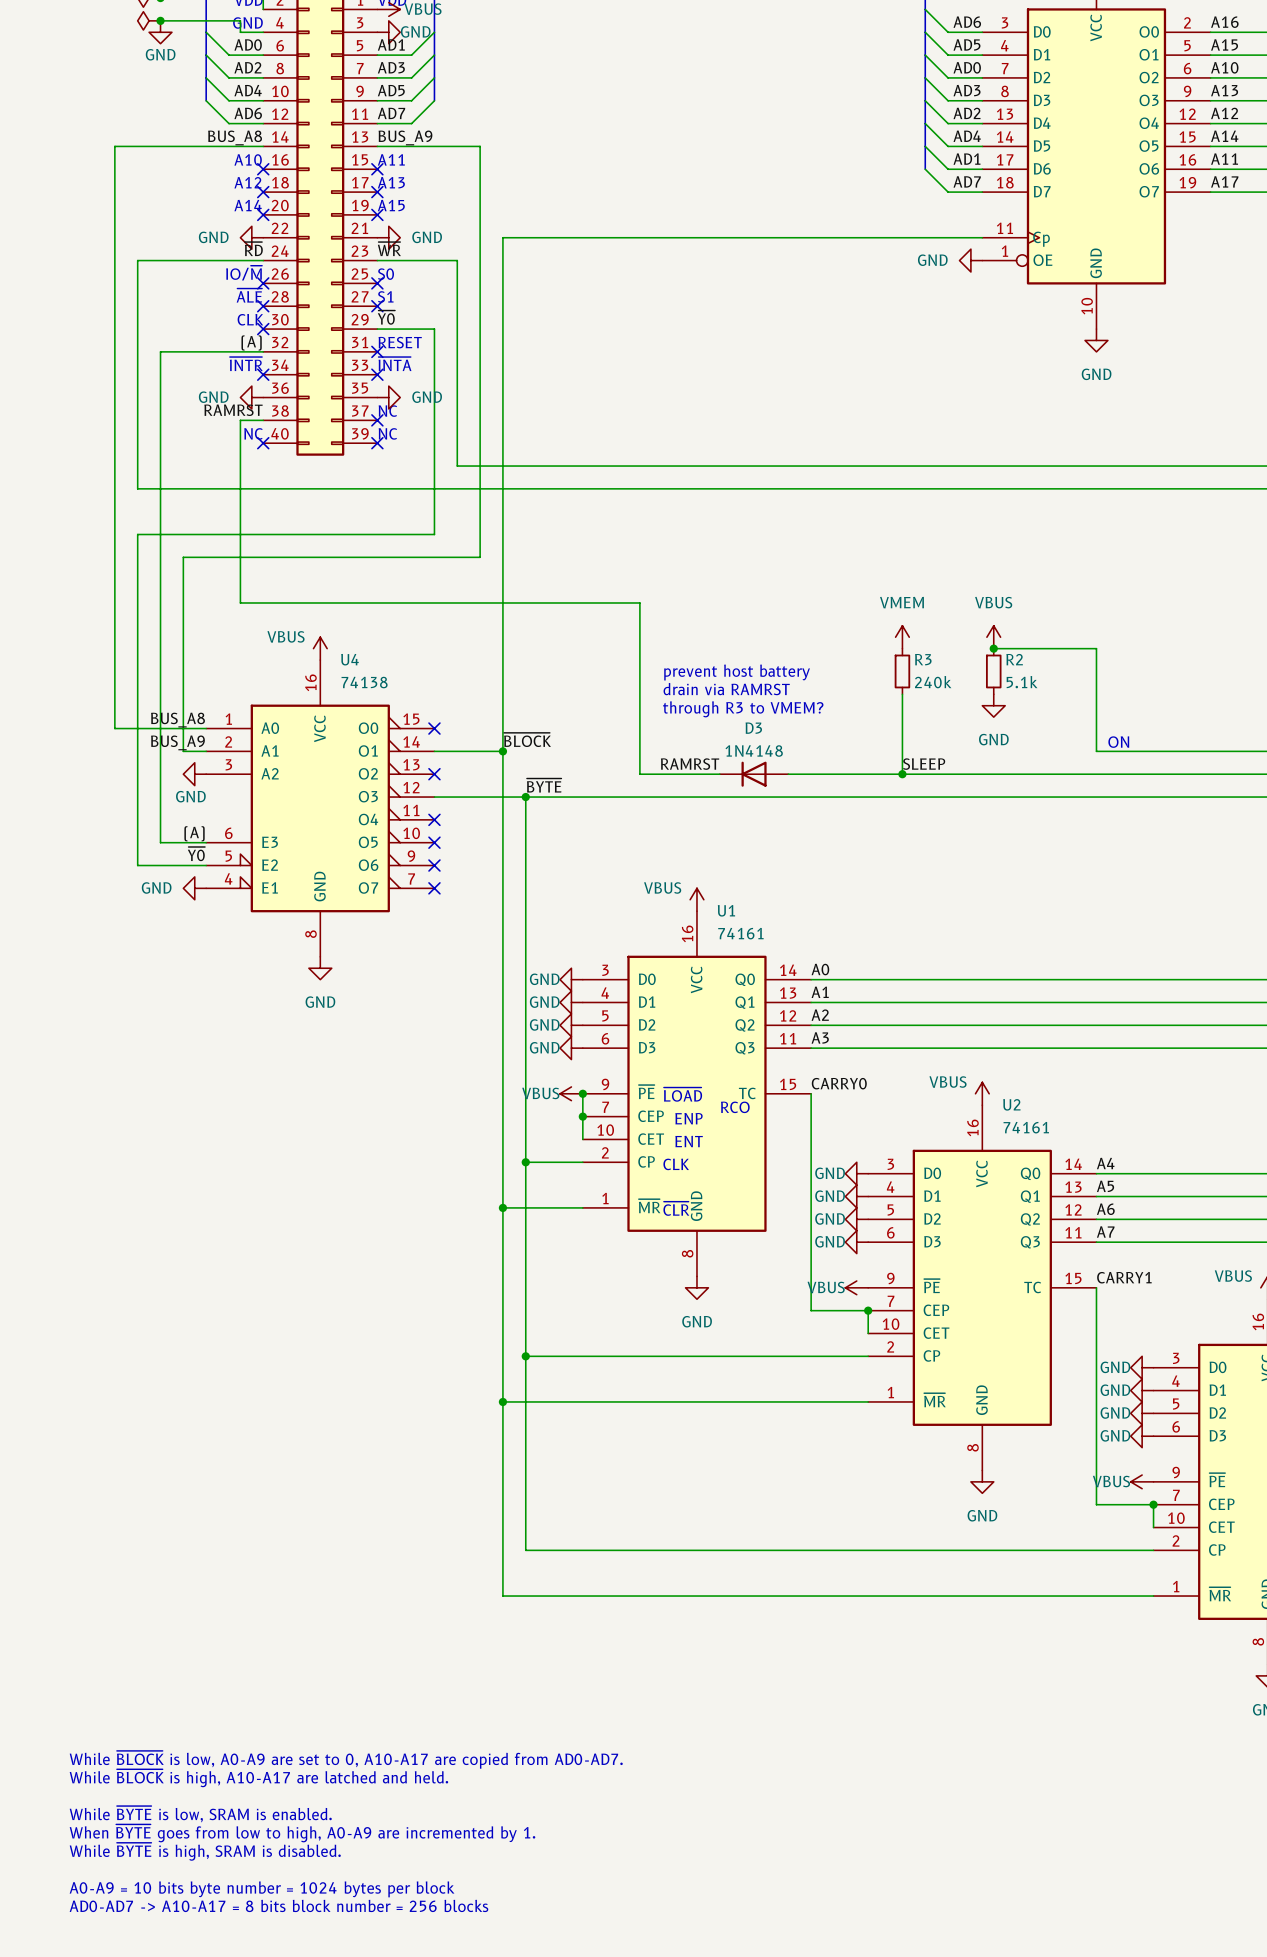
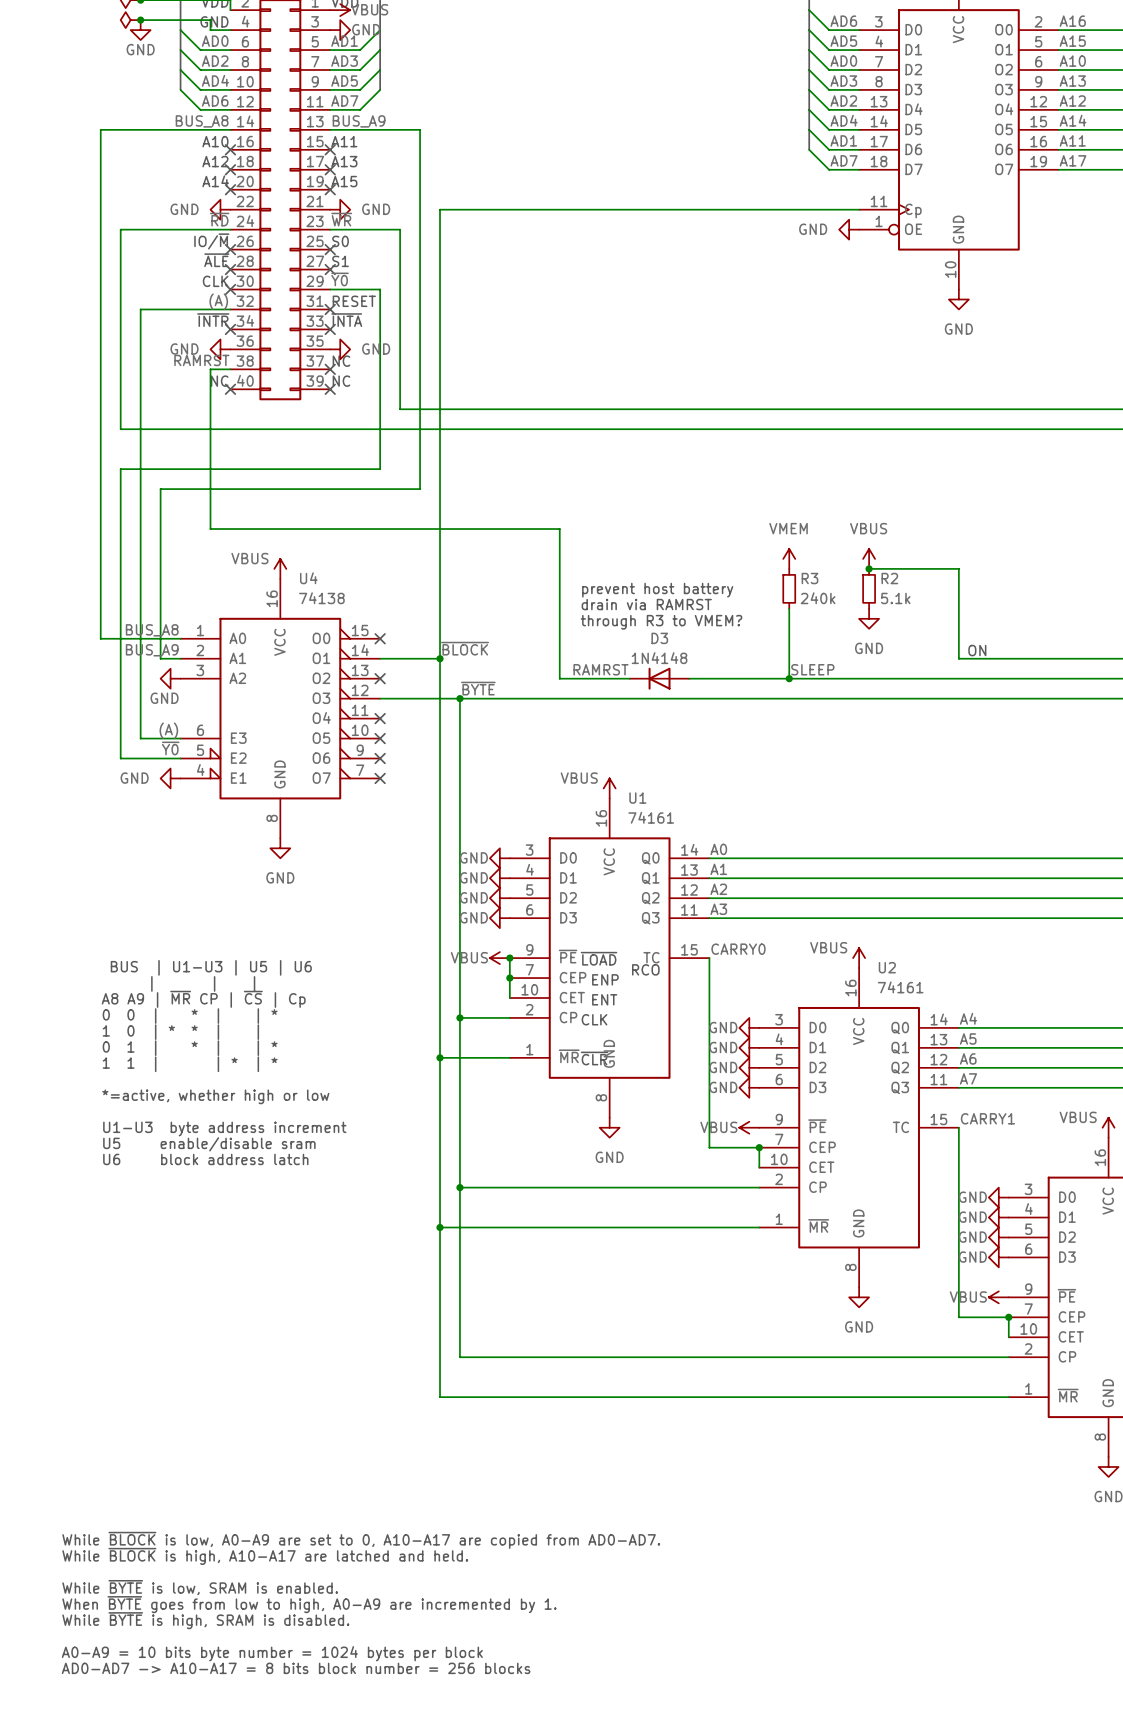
text: none -> BUS | U1-U3 | U5 | U6 (211, 967)
text: none -> | | | (203, 983)
text: none -> A8 A9 | ~{MR} CP | ~{CS} | Cp (203, 999)
text: none -> 0 0 | * | | * (190, 1016)
text: none -> 1 0 | * * | | (180, 1032)
text: none -> 0 1 | * | | * (190, 1048)
text: none -> 1 1 | | * | * (190, 1064)
text: none -> *=active, whether high or low (215, 1096)
text: none -> U1-U3 byte address increment (224, 1128)
text: none -> U5 enable/disable sram (209, 1144)
text: none -> U6 block address latch (205, 1159)

